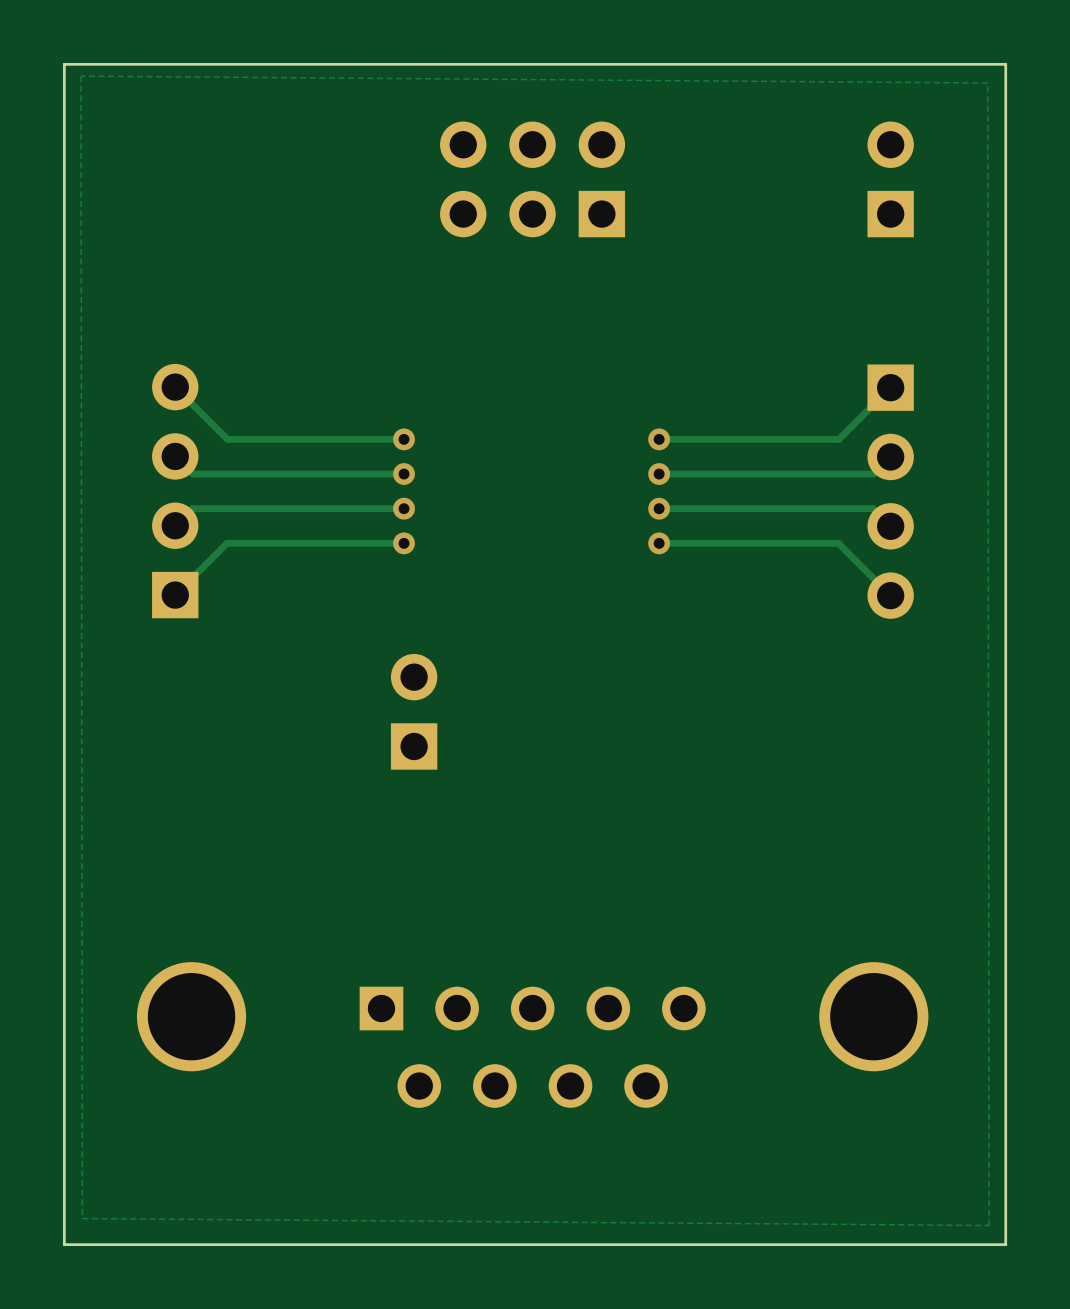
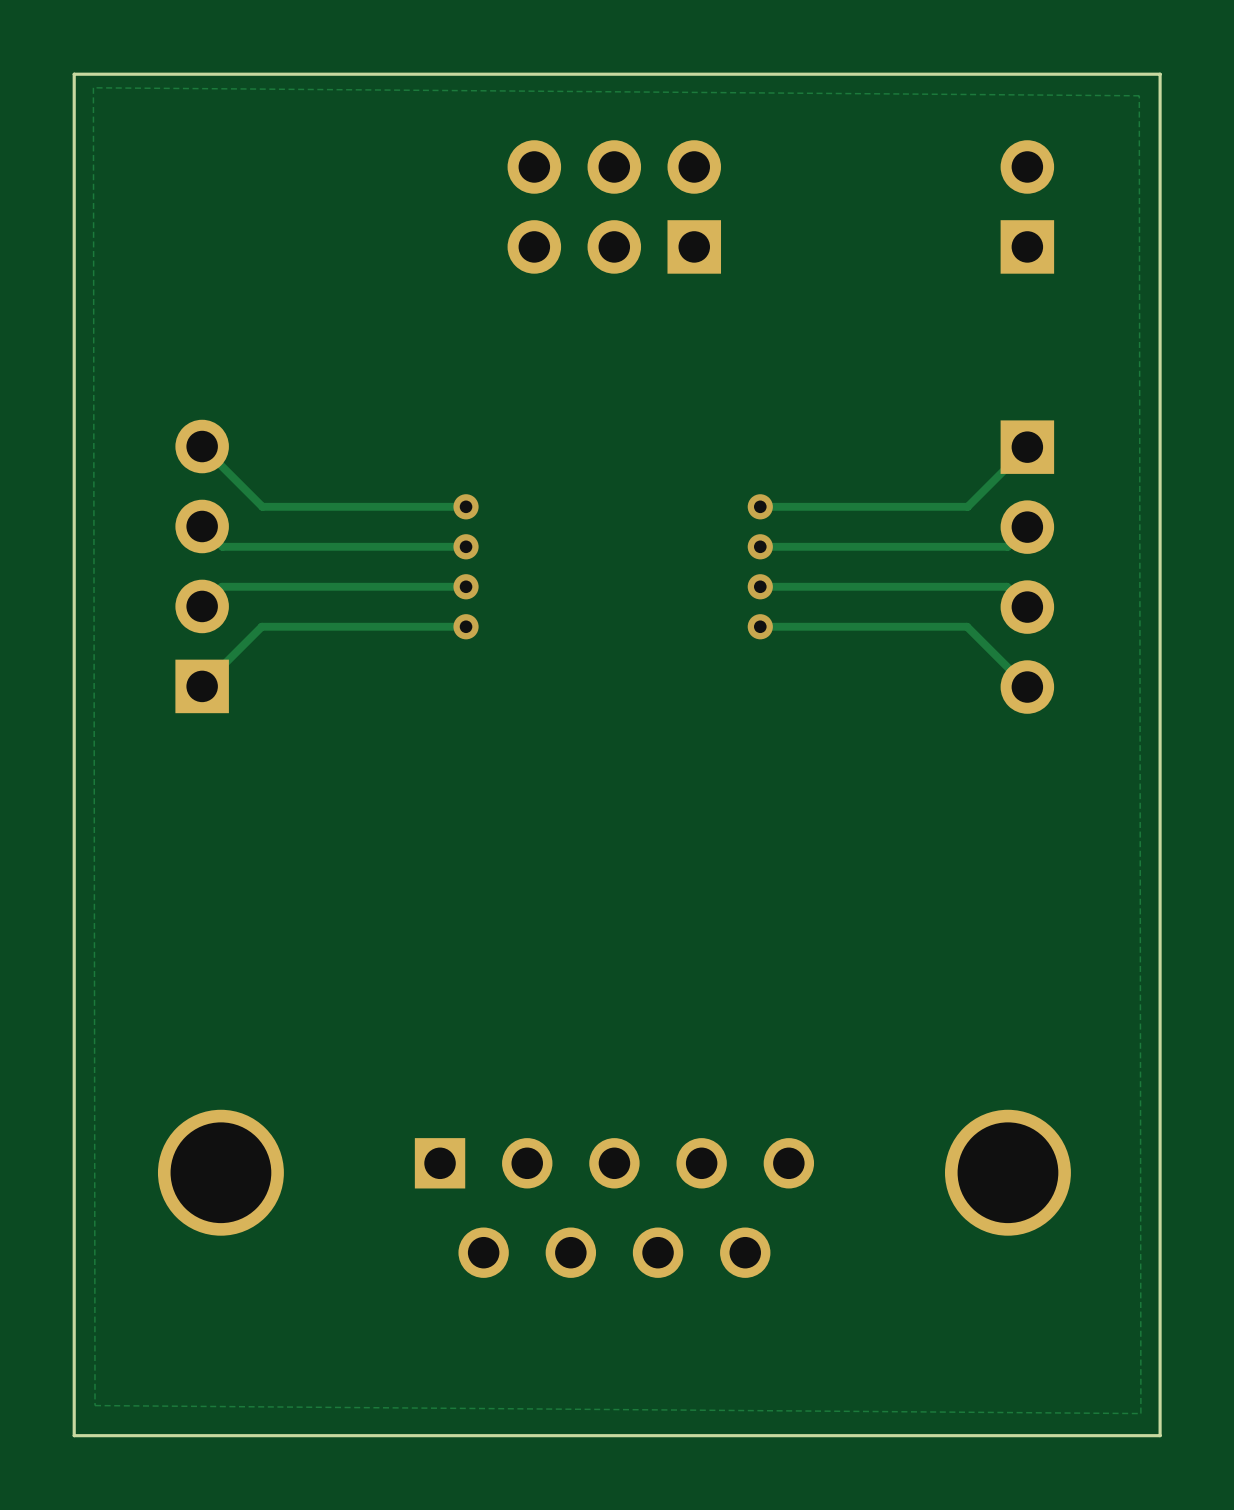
part: (414, 711) -> none

